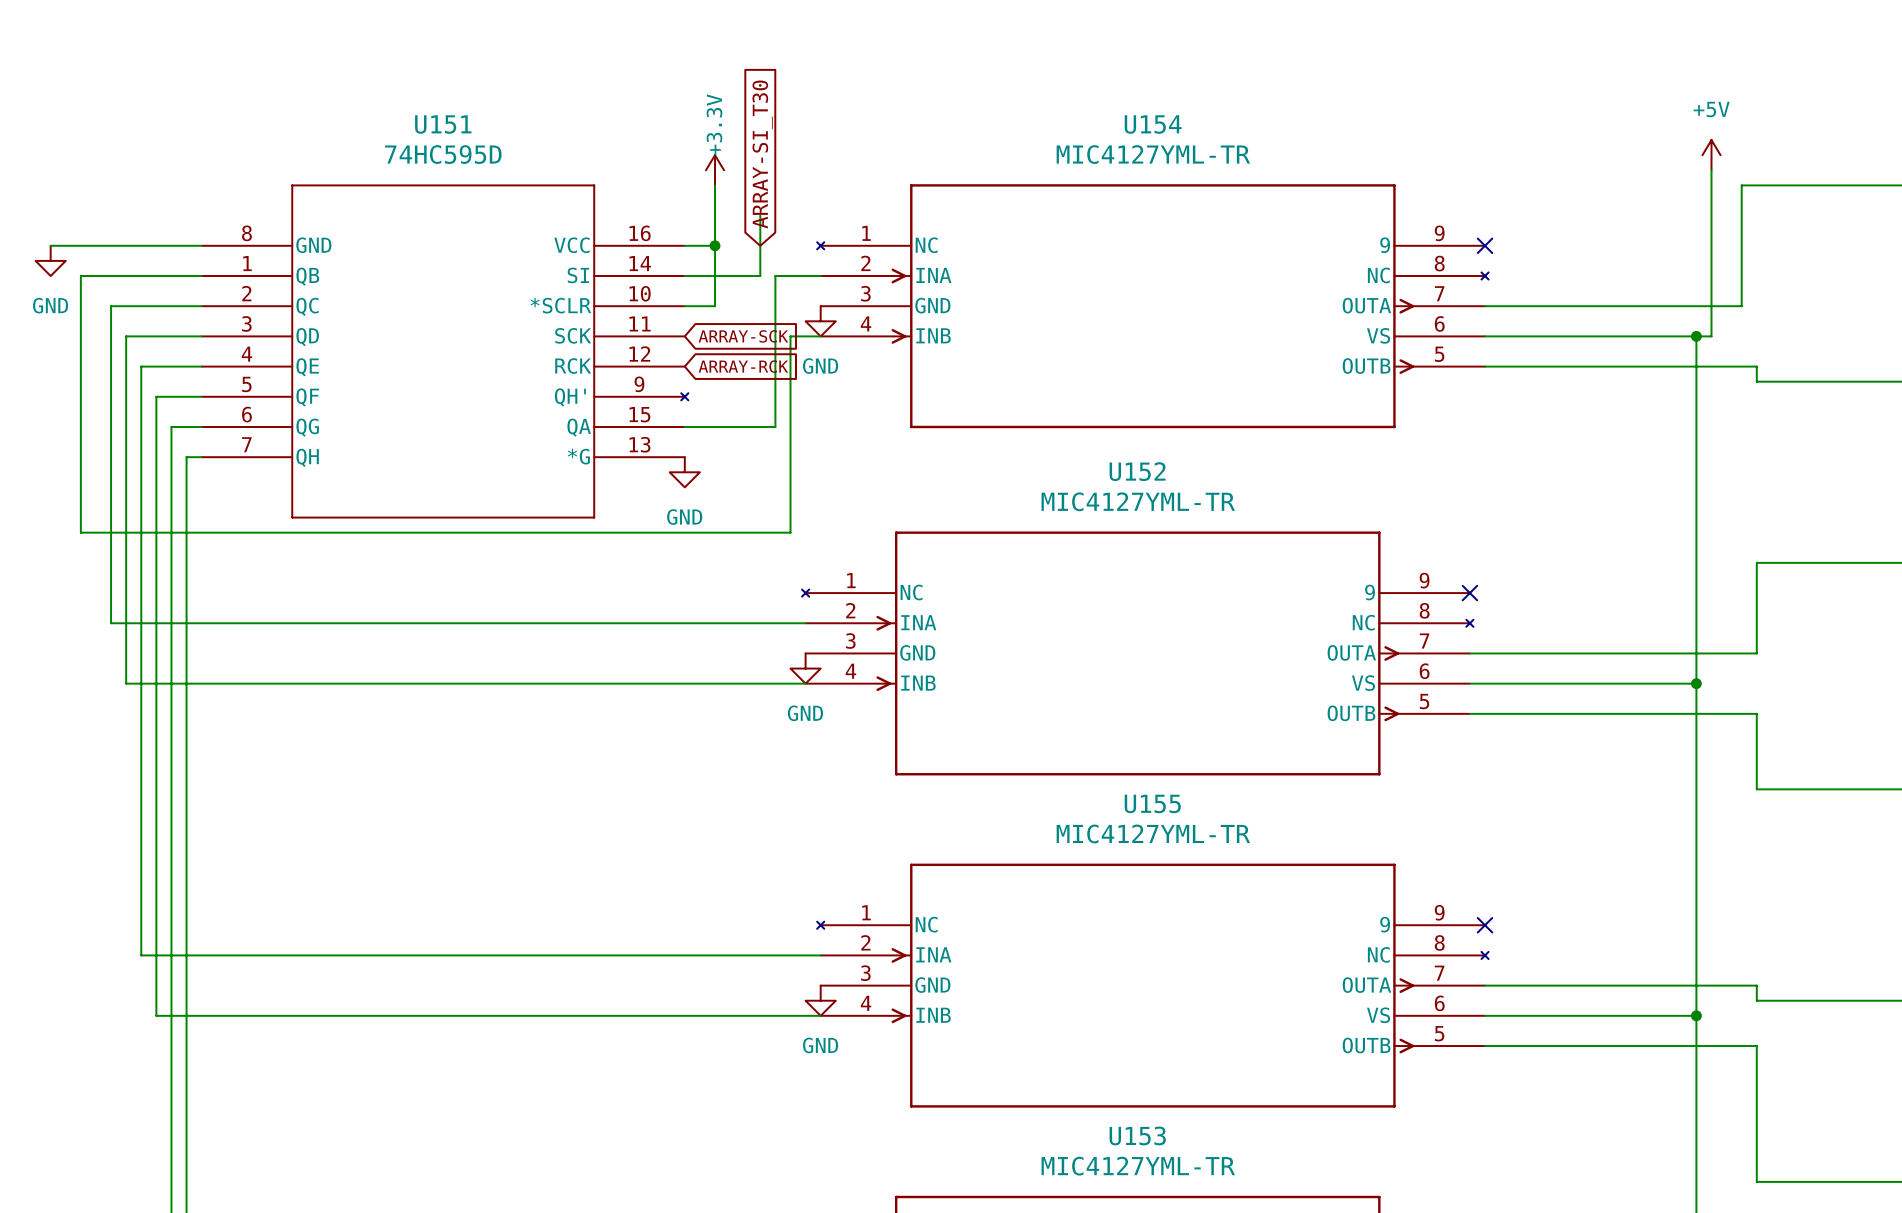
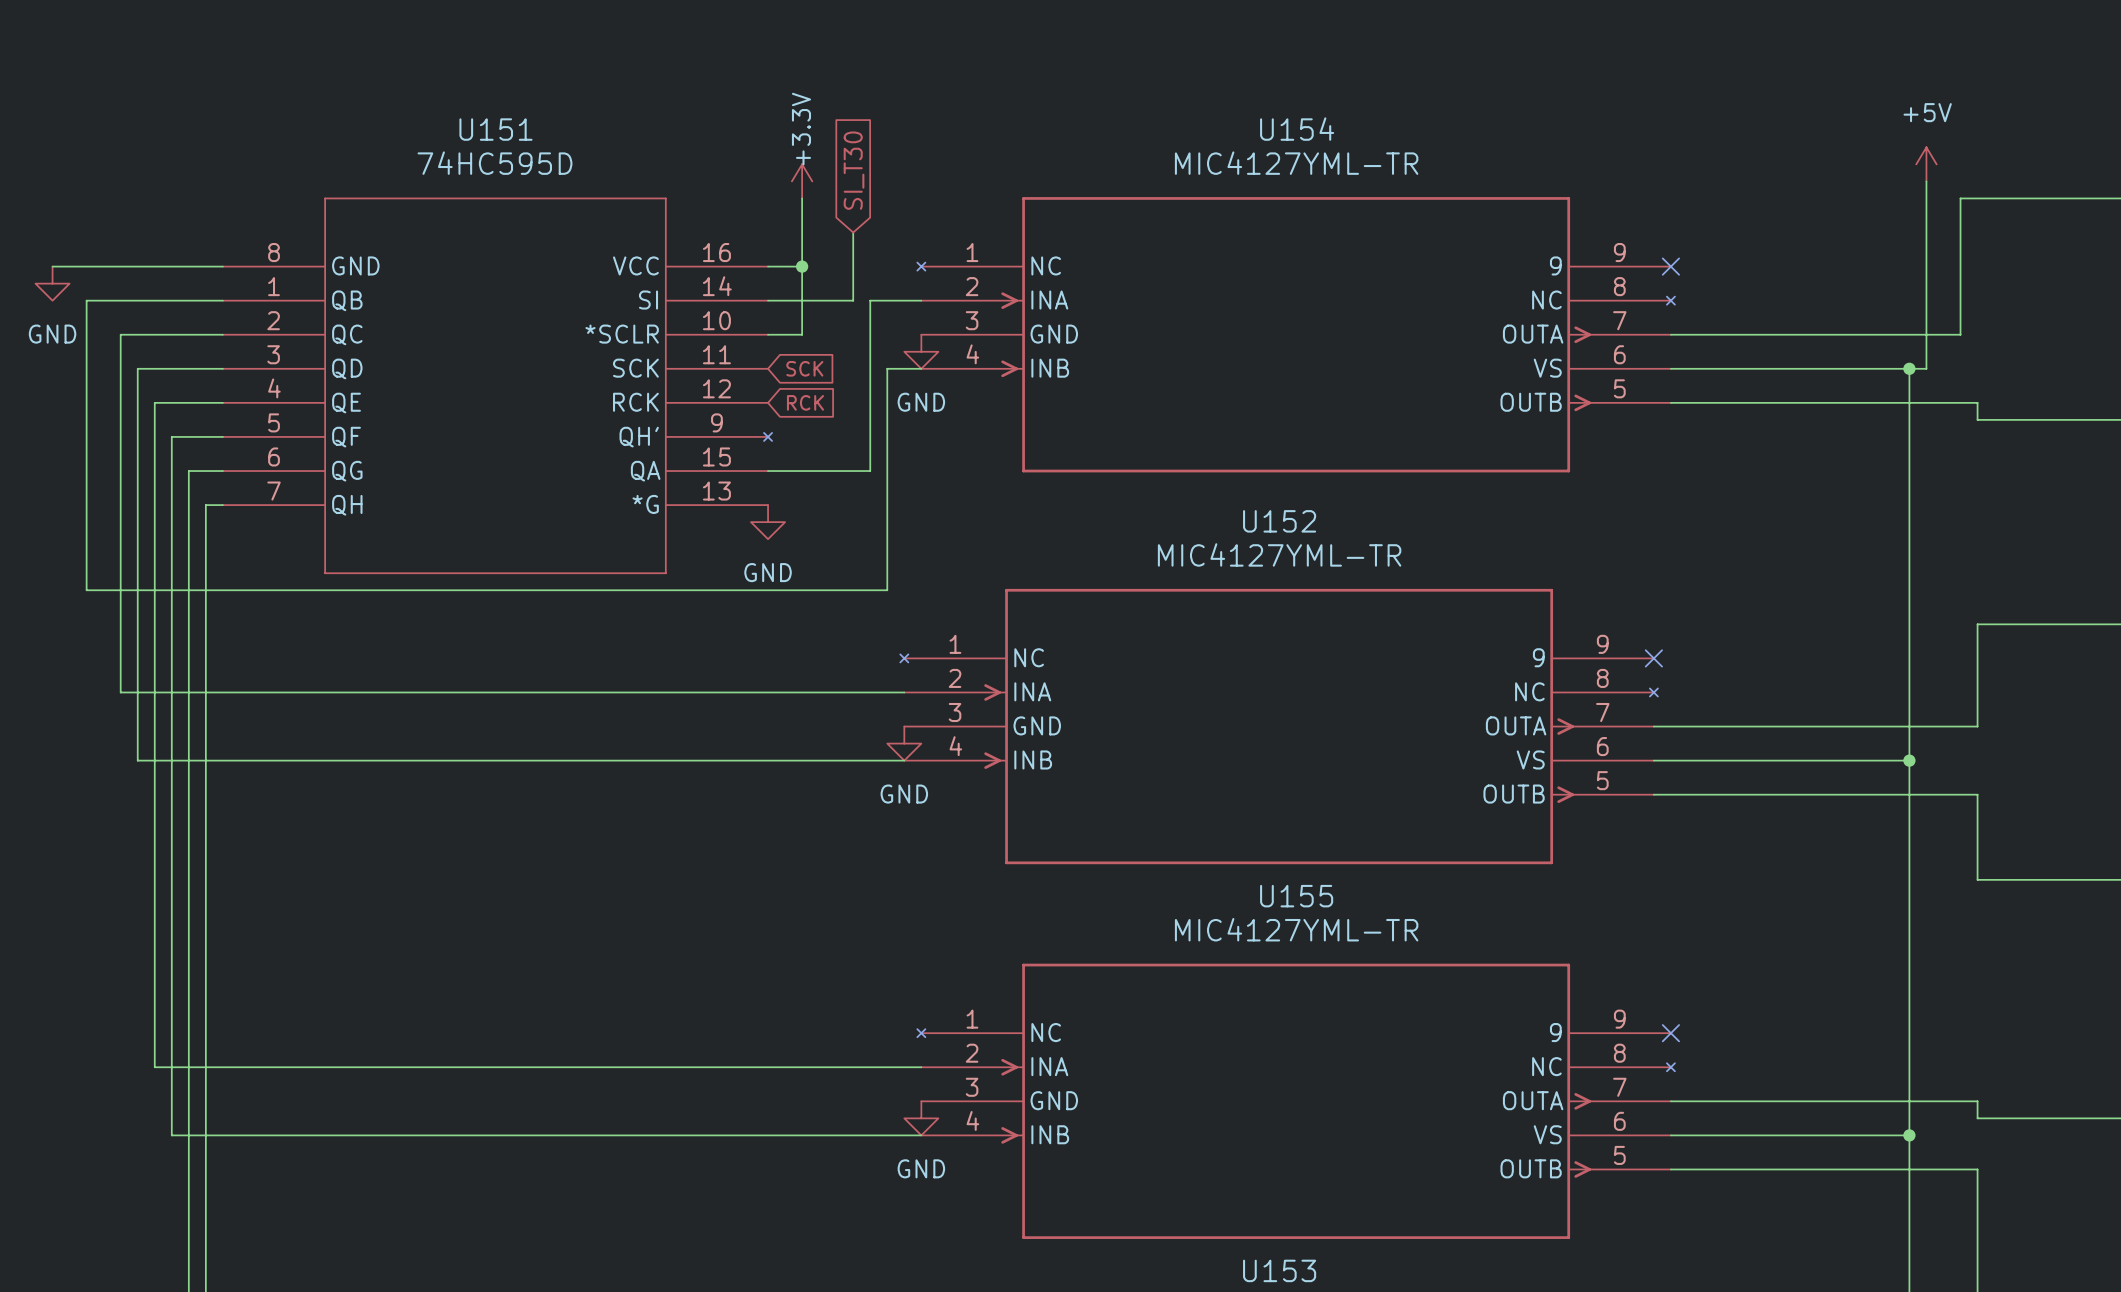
global label: ARRAY-SI_T30 (762, 154) -> SI_T30 (854, 170)
global label: ARRAY-SCK (743, 336) -> SCK (804, 368)
global label: ARRAY-RCK (743, 366) -> RCK (805, 402)

